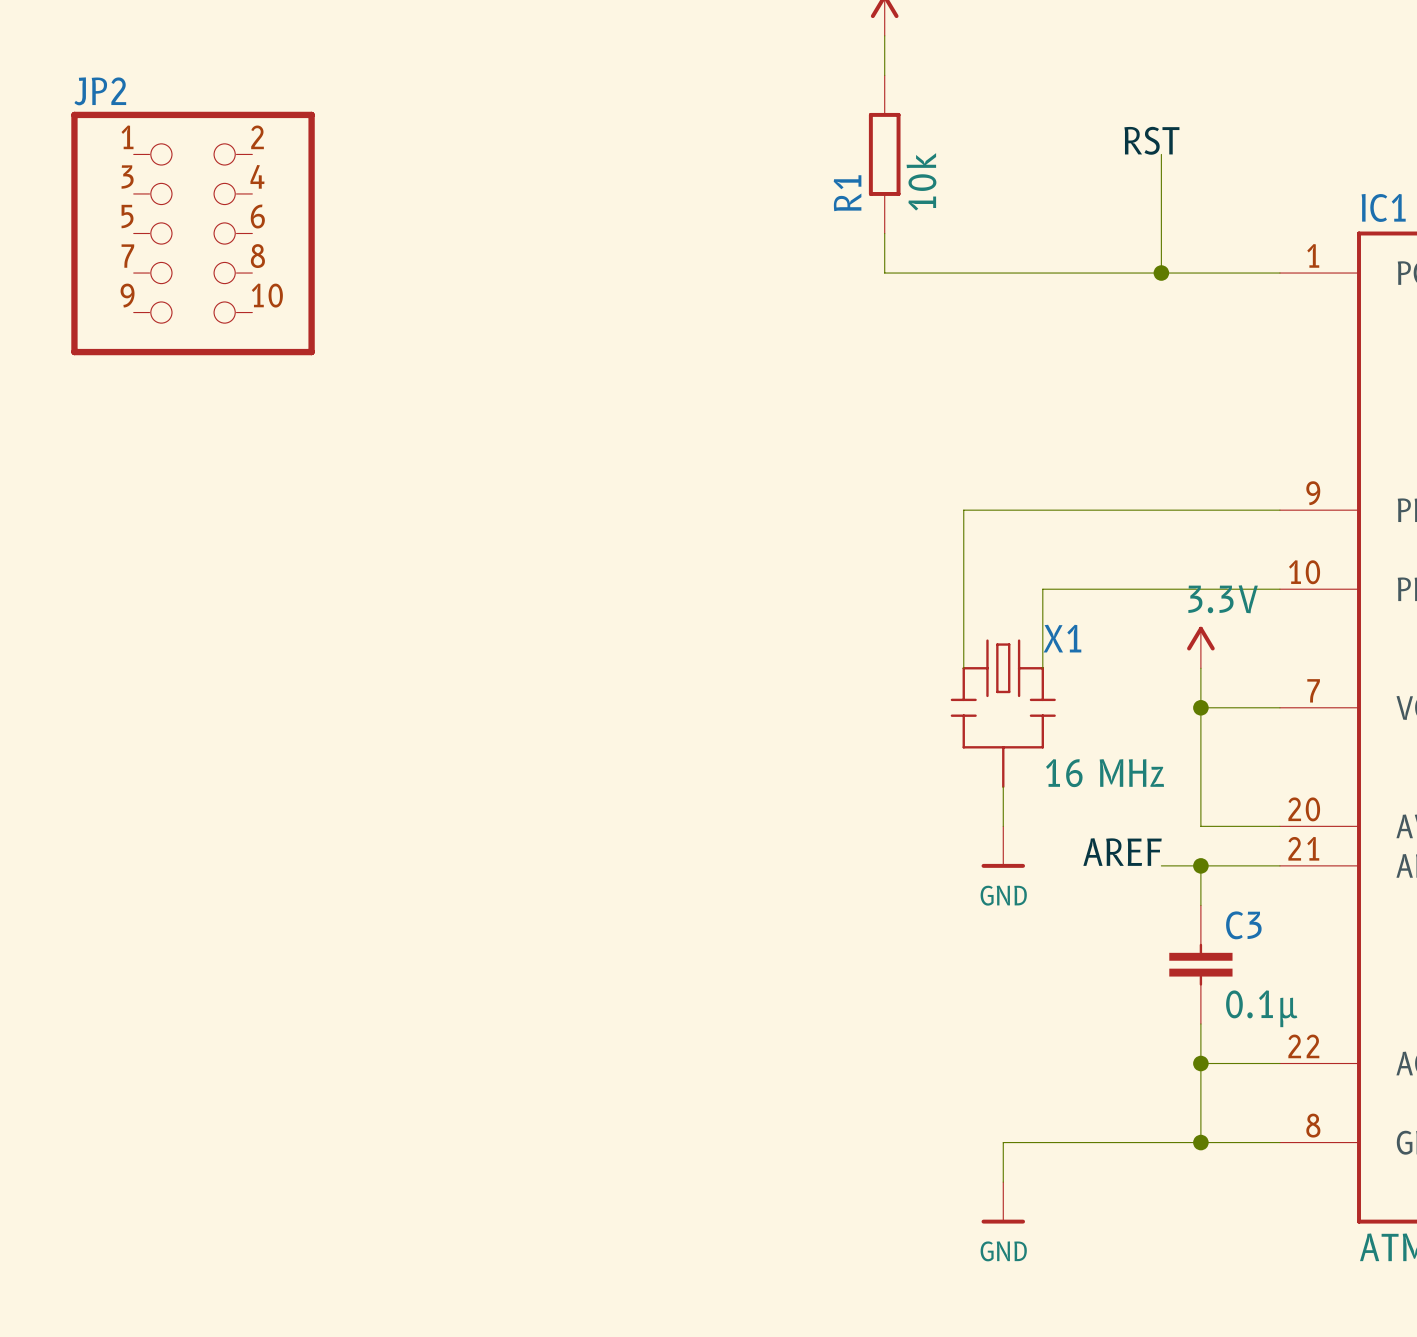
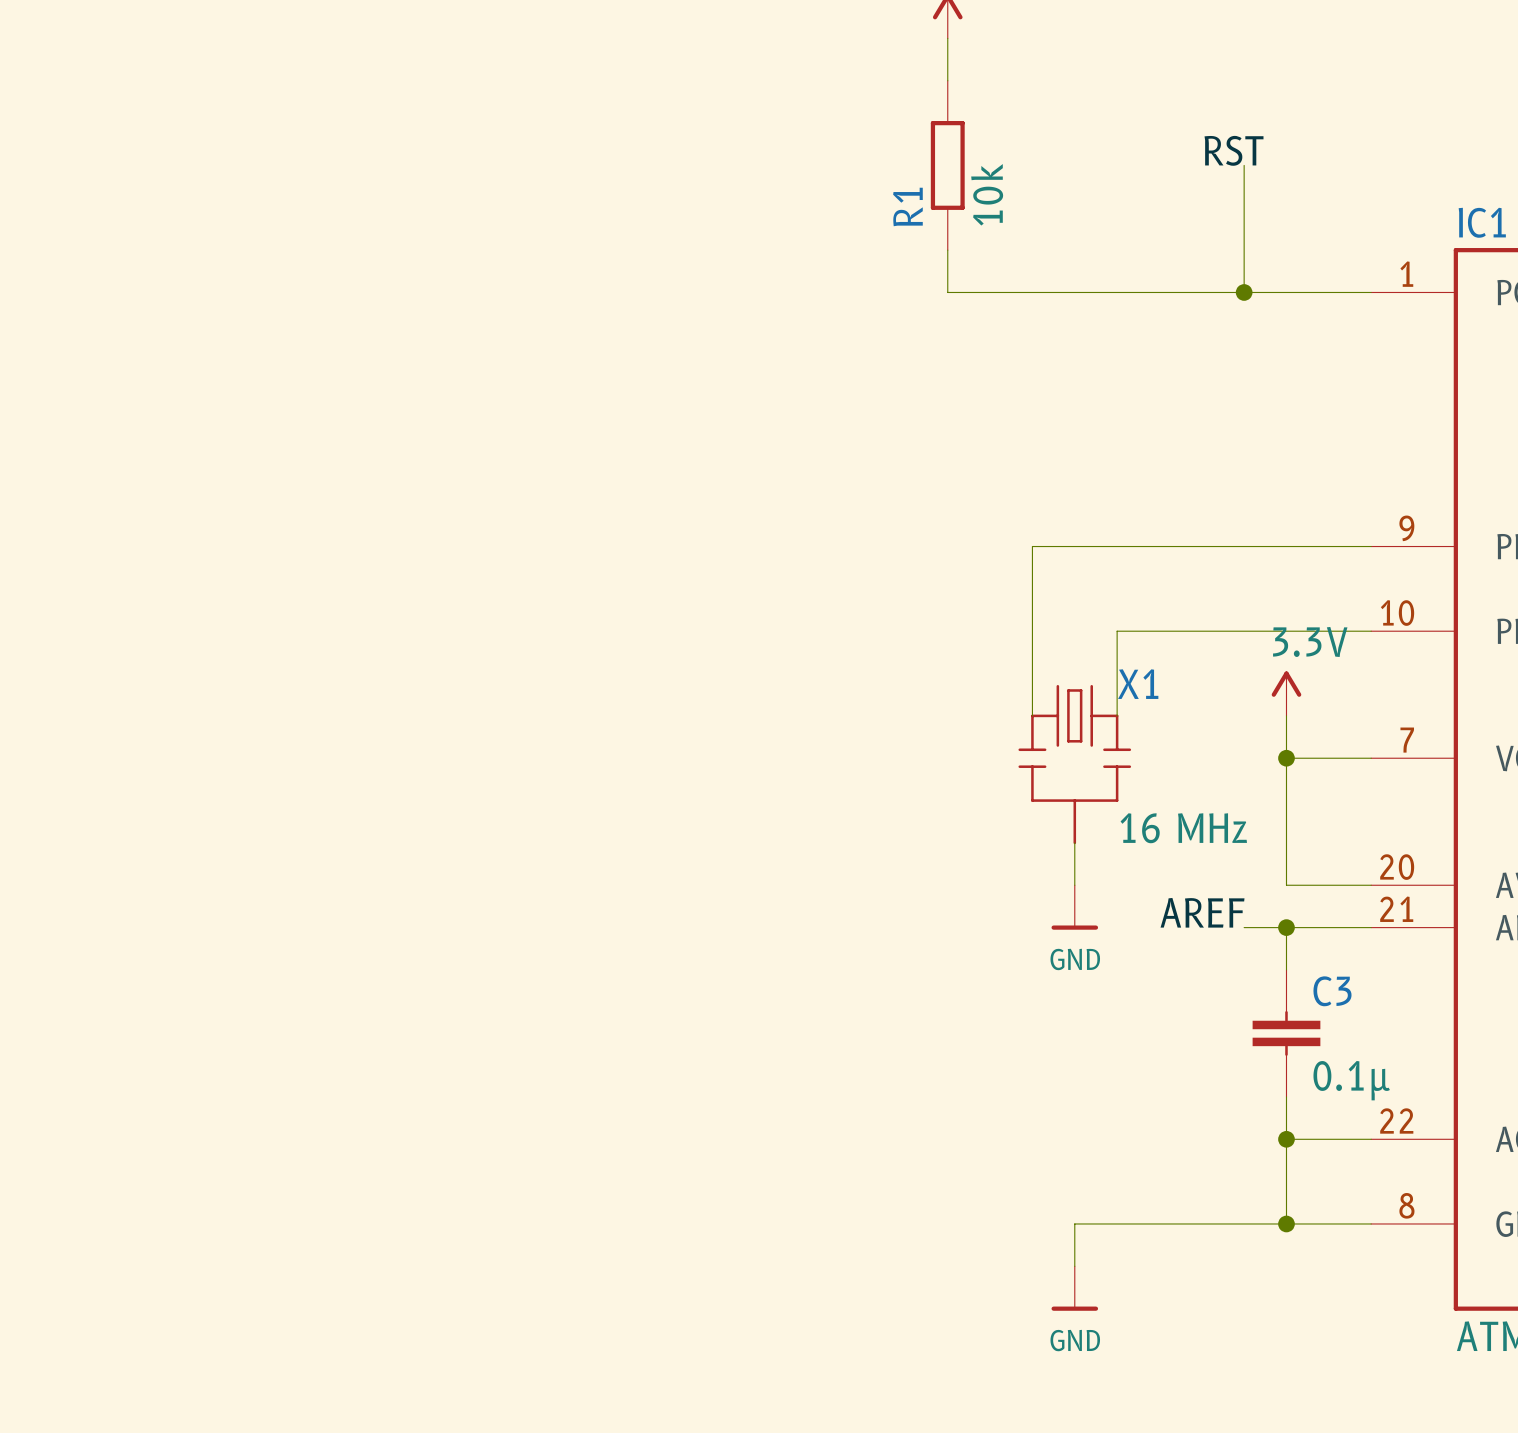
JP2: (193, 233) -> none

